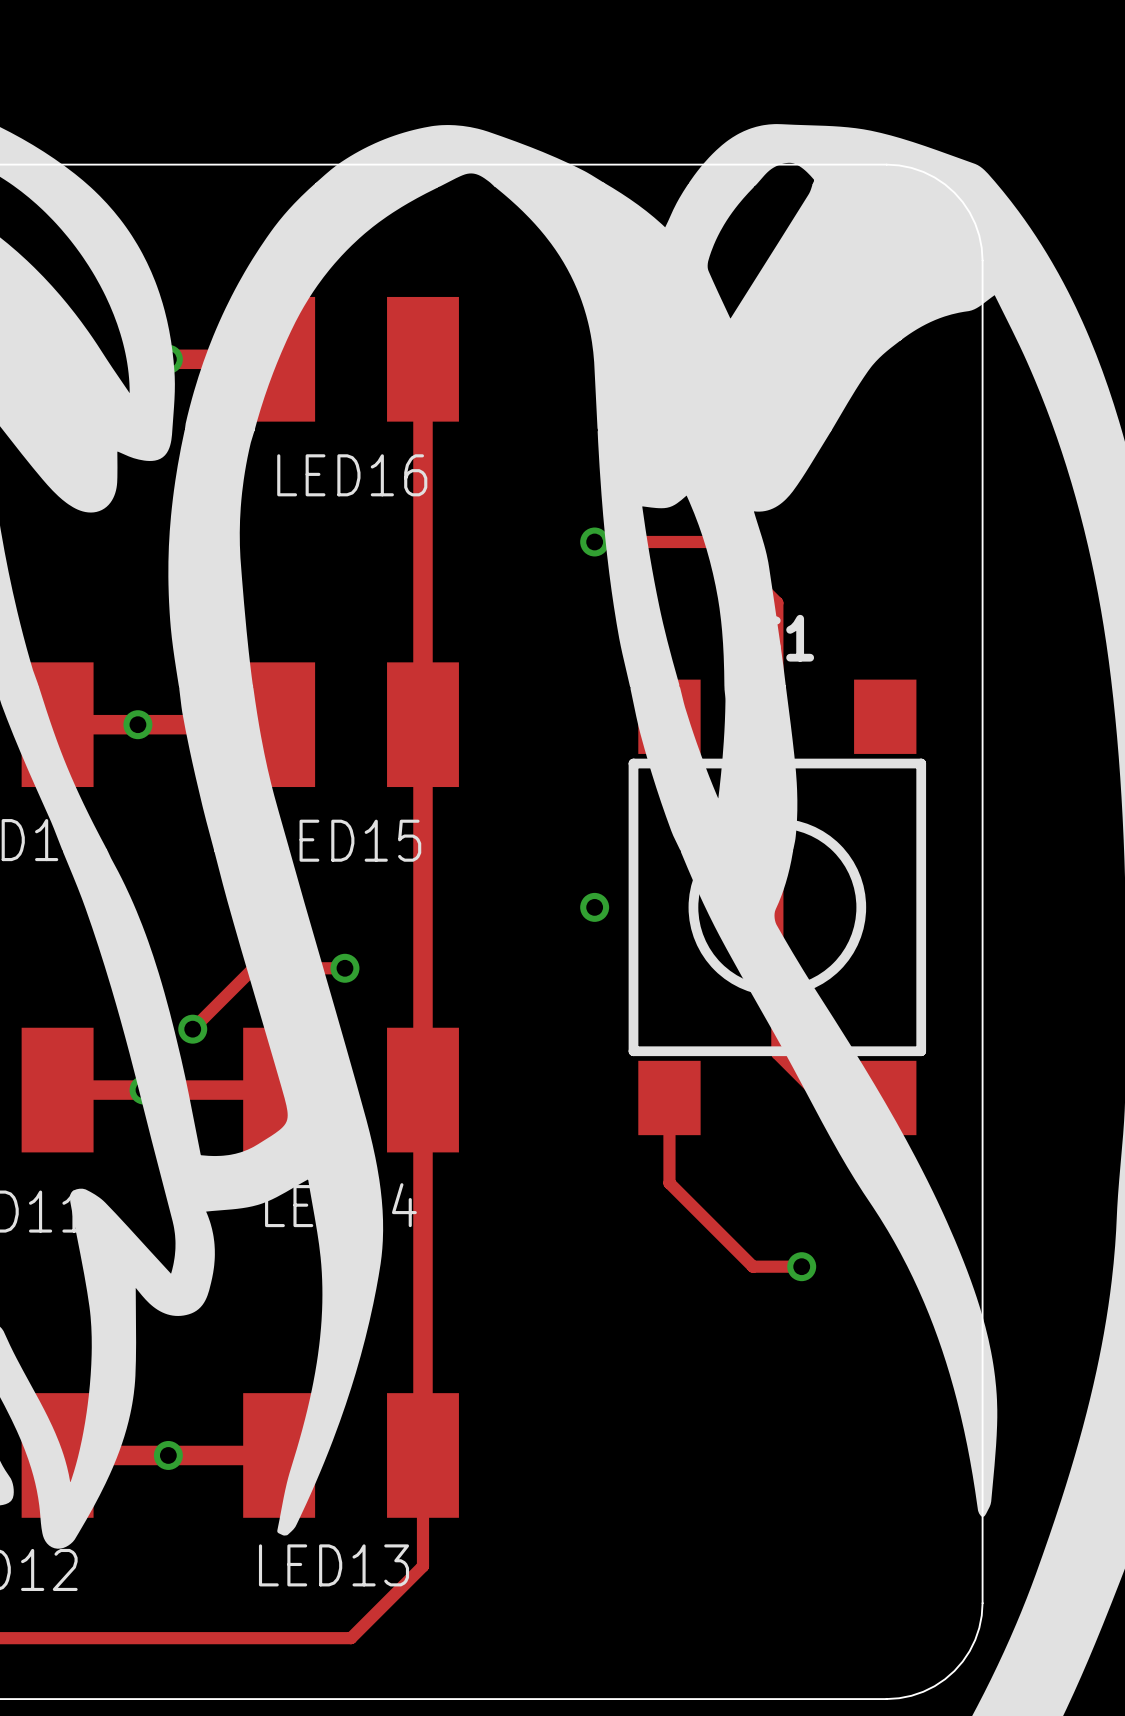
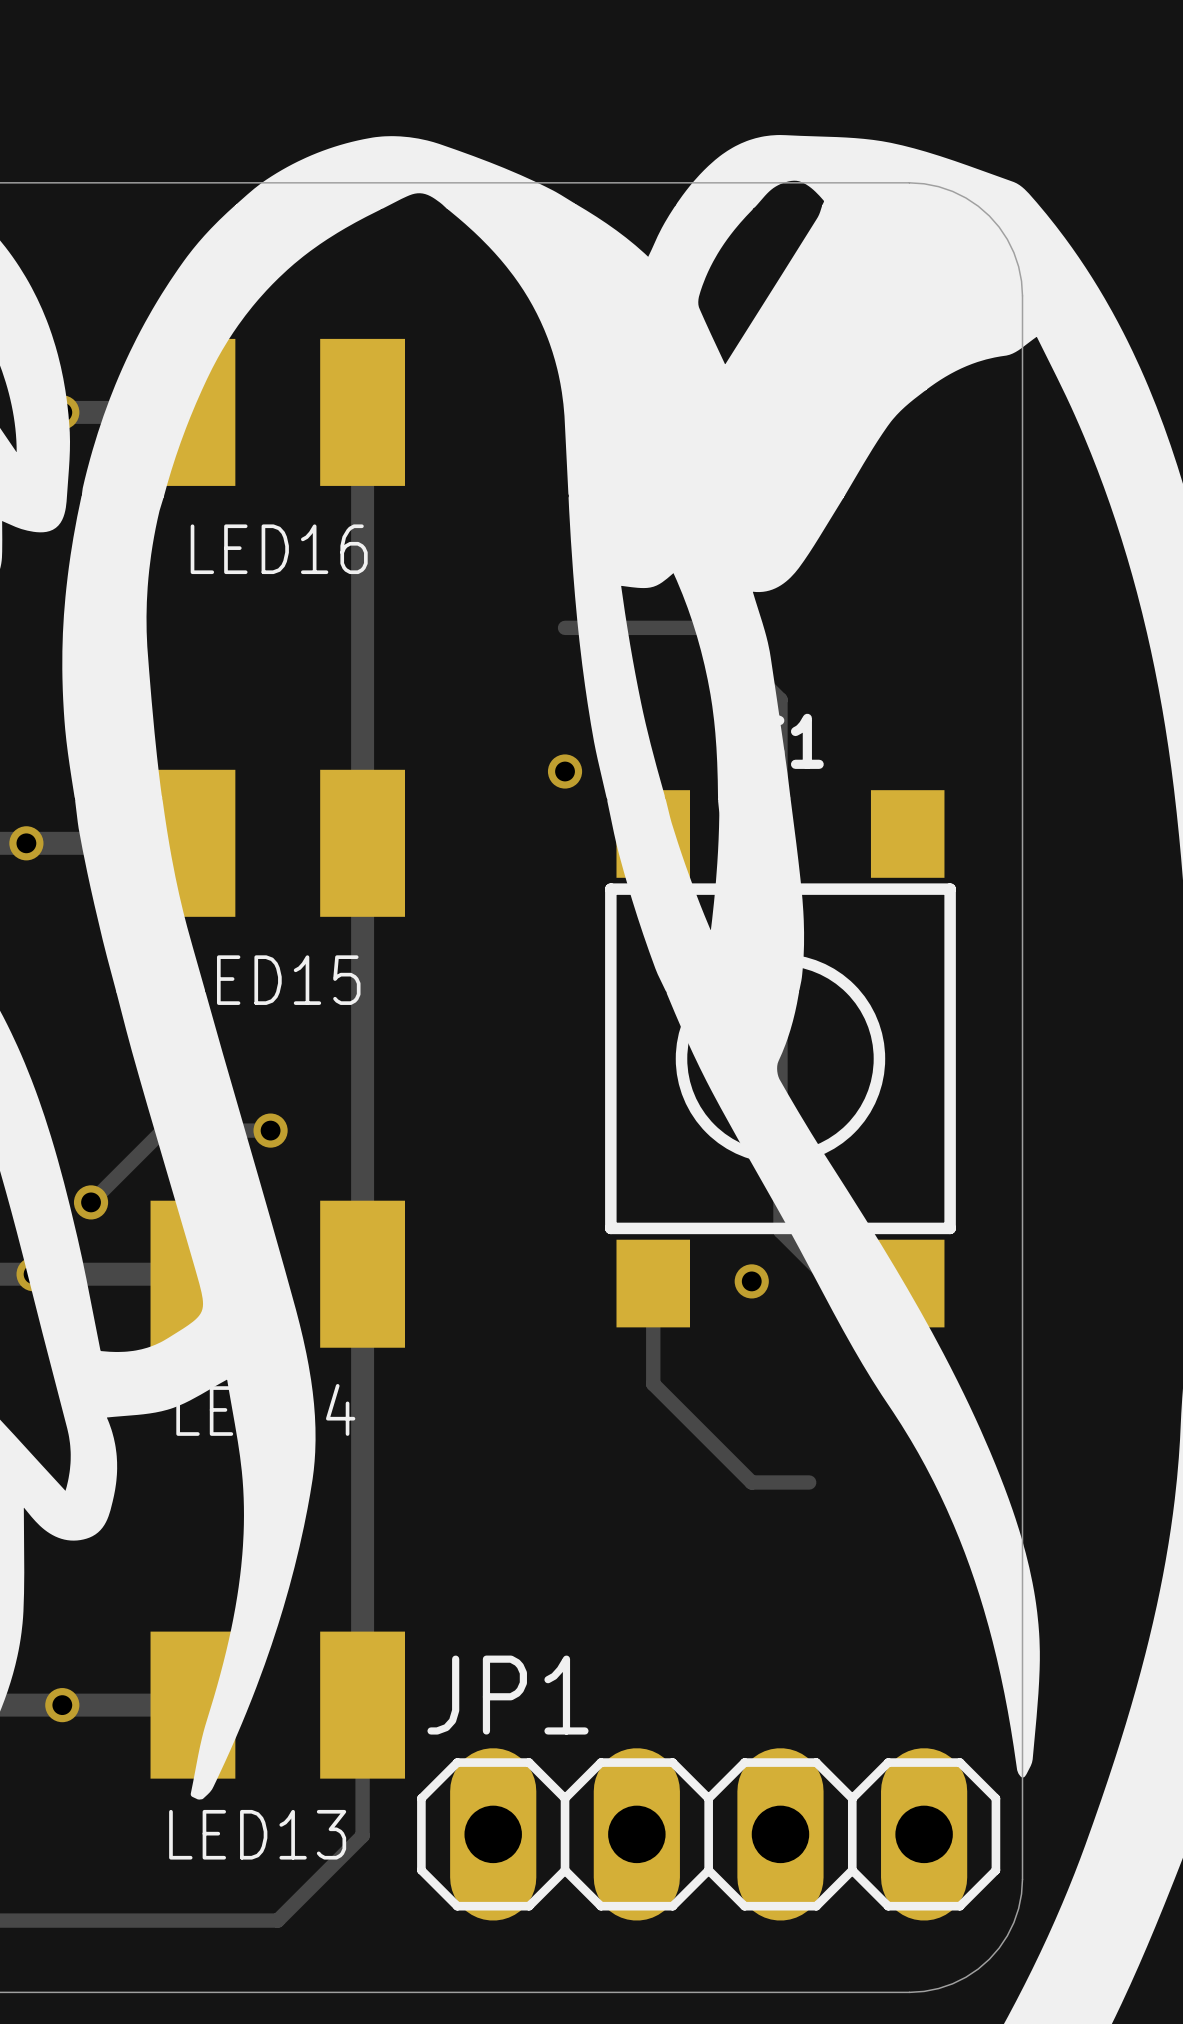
via: (594, 541) -> none
via: none -> (565, 771)
via: (594, 907) -> none
via: none -> (751, 1281)
via: (801, 1266) -> none
JP1: none -> (708, 1834)

